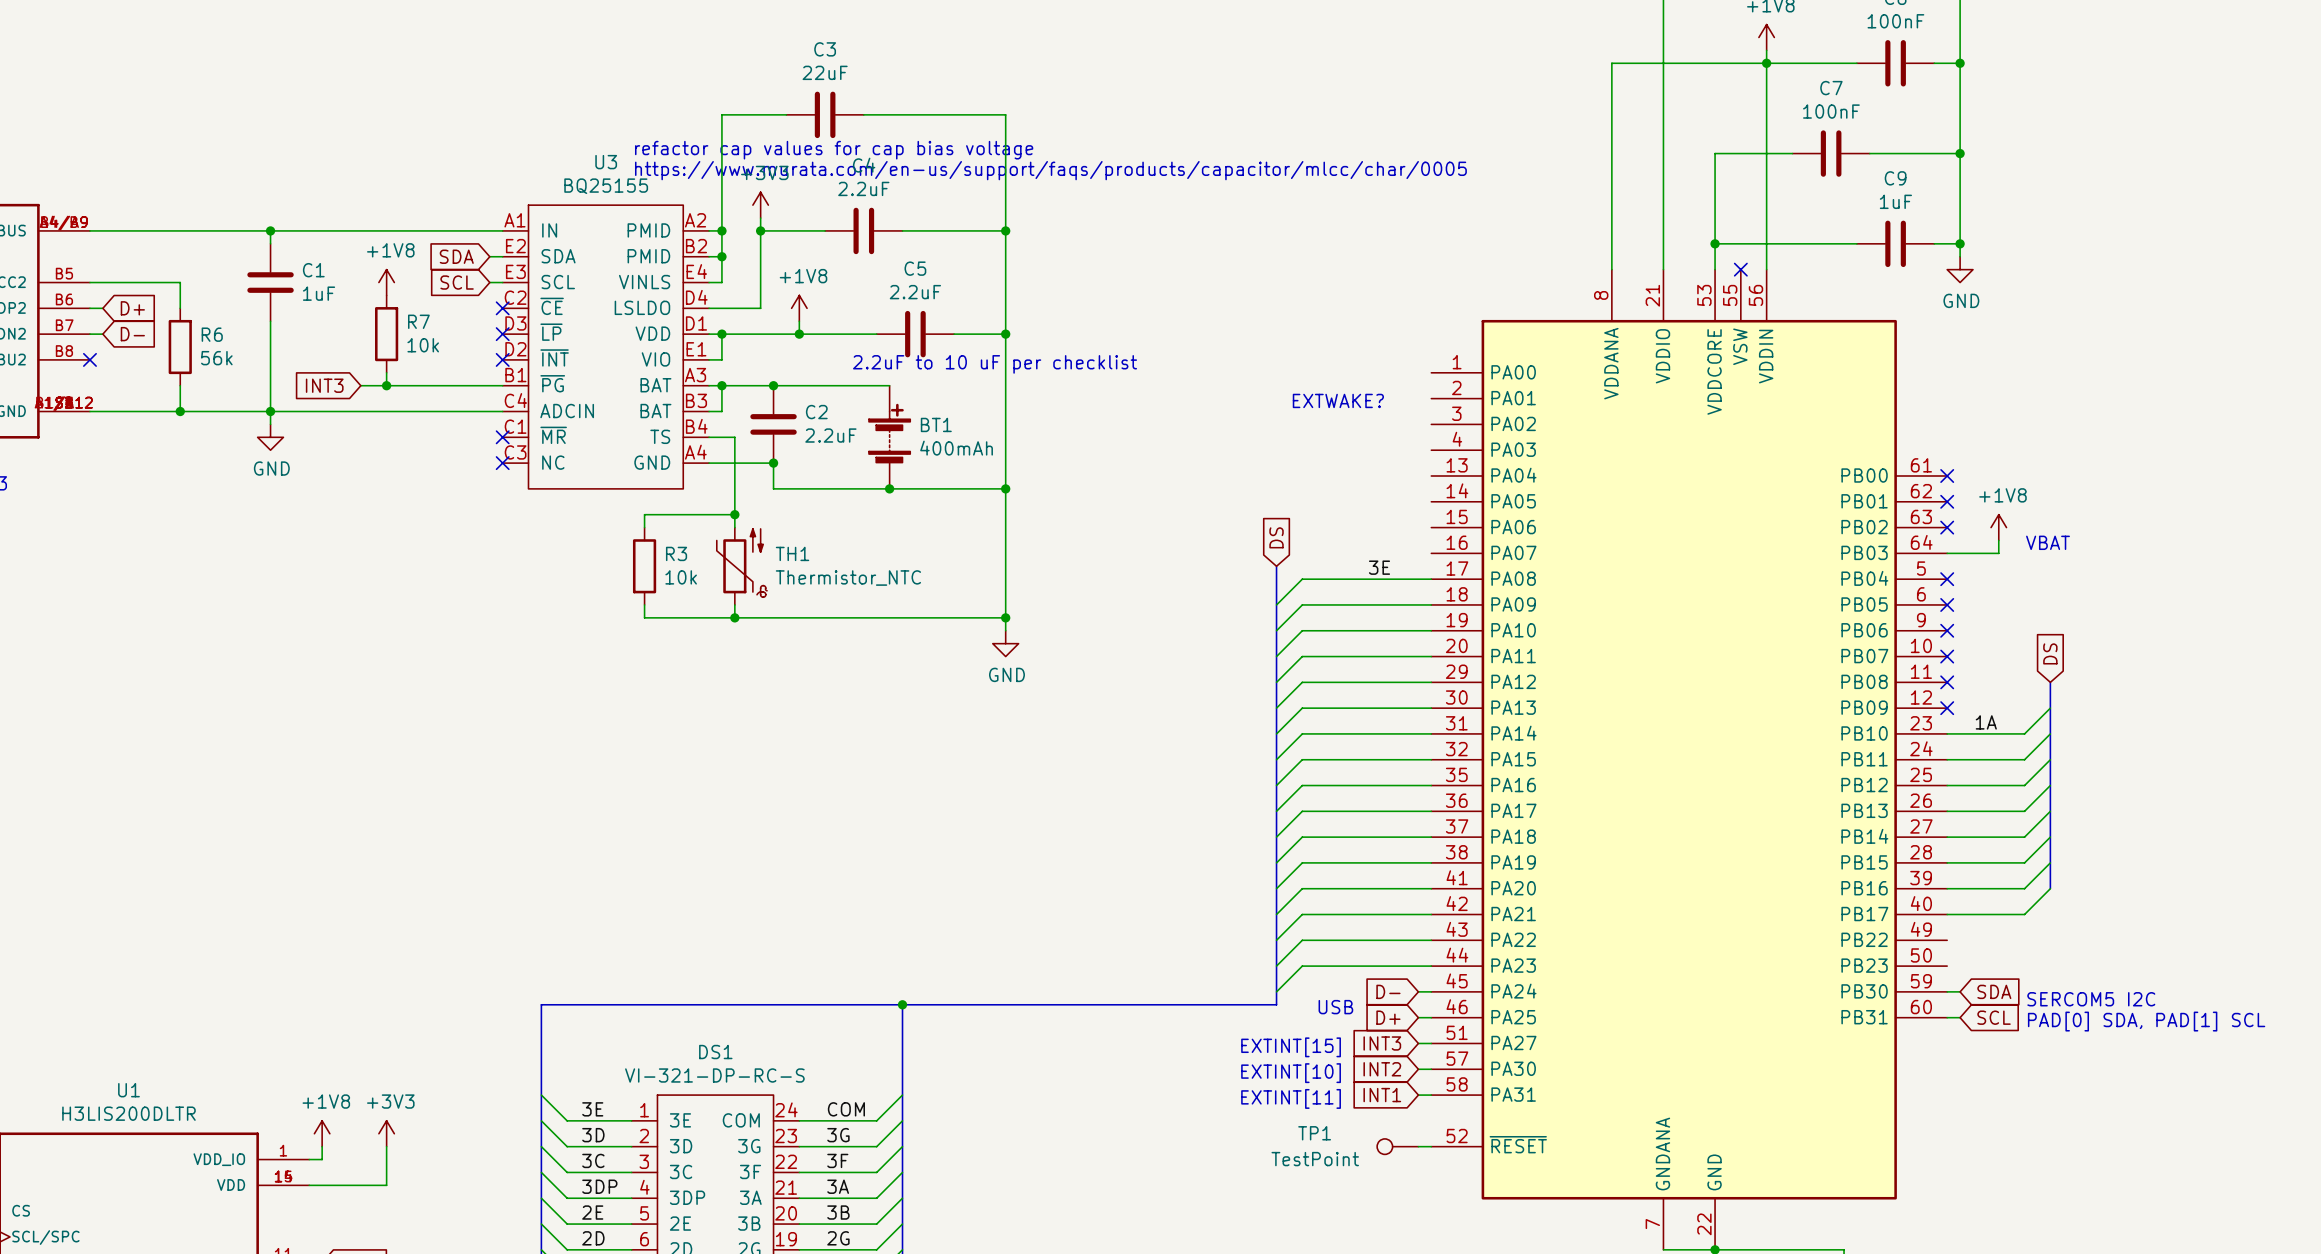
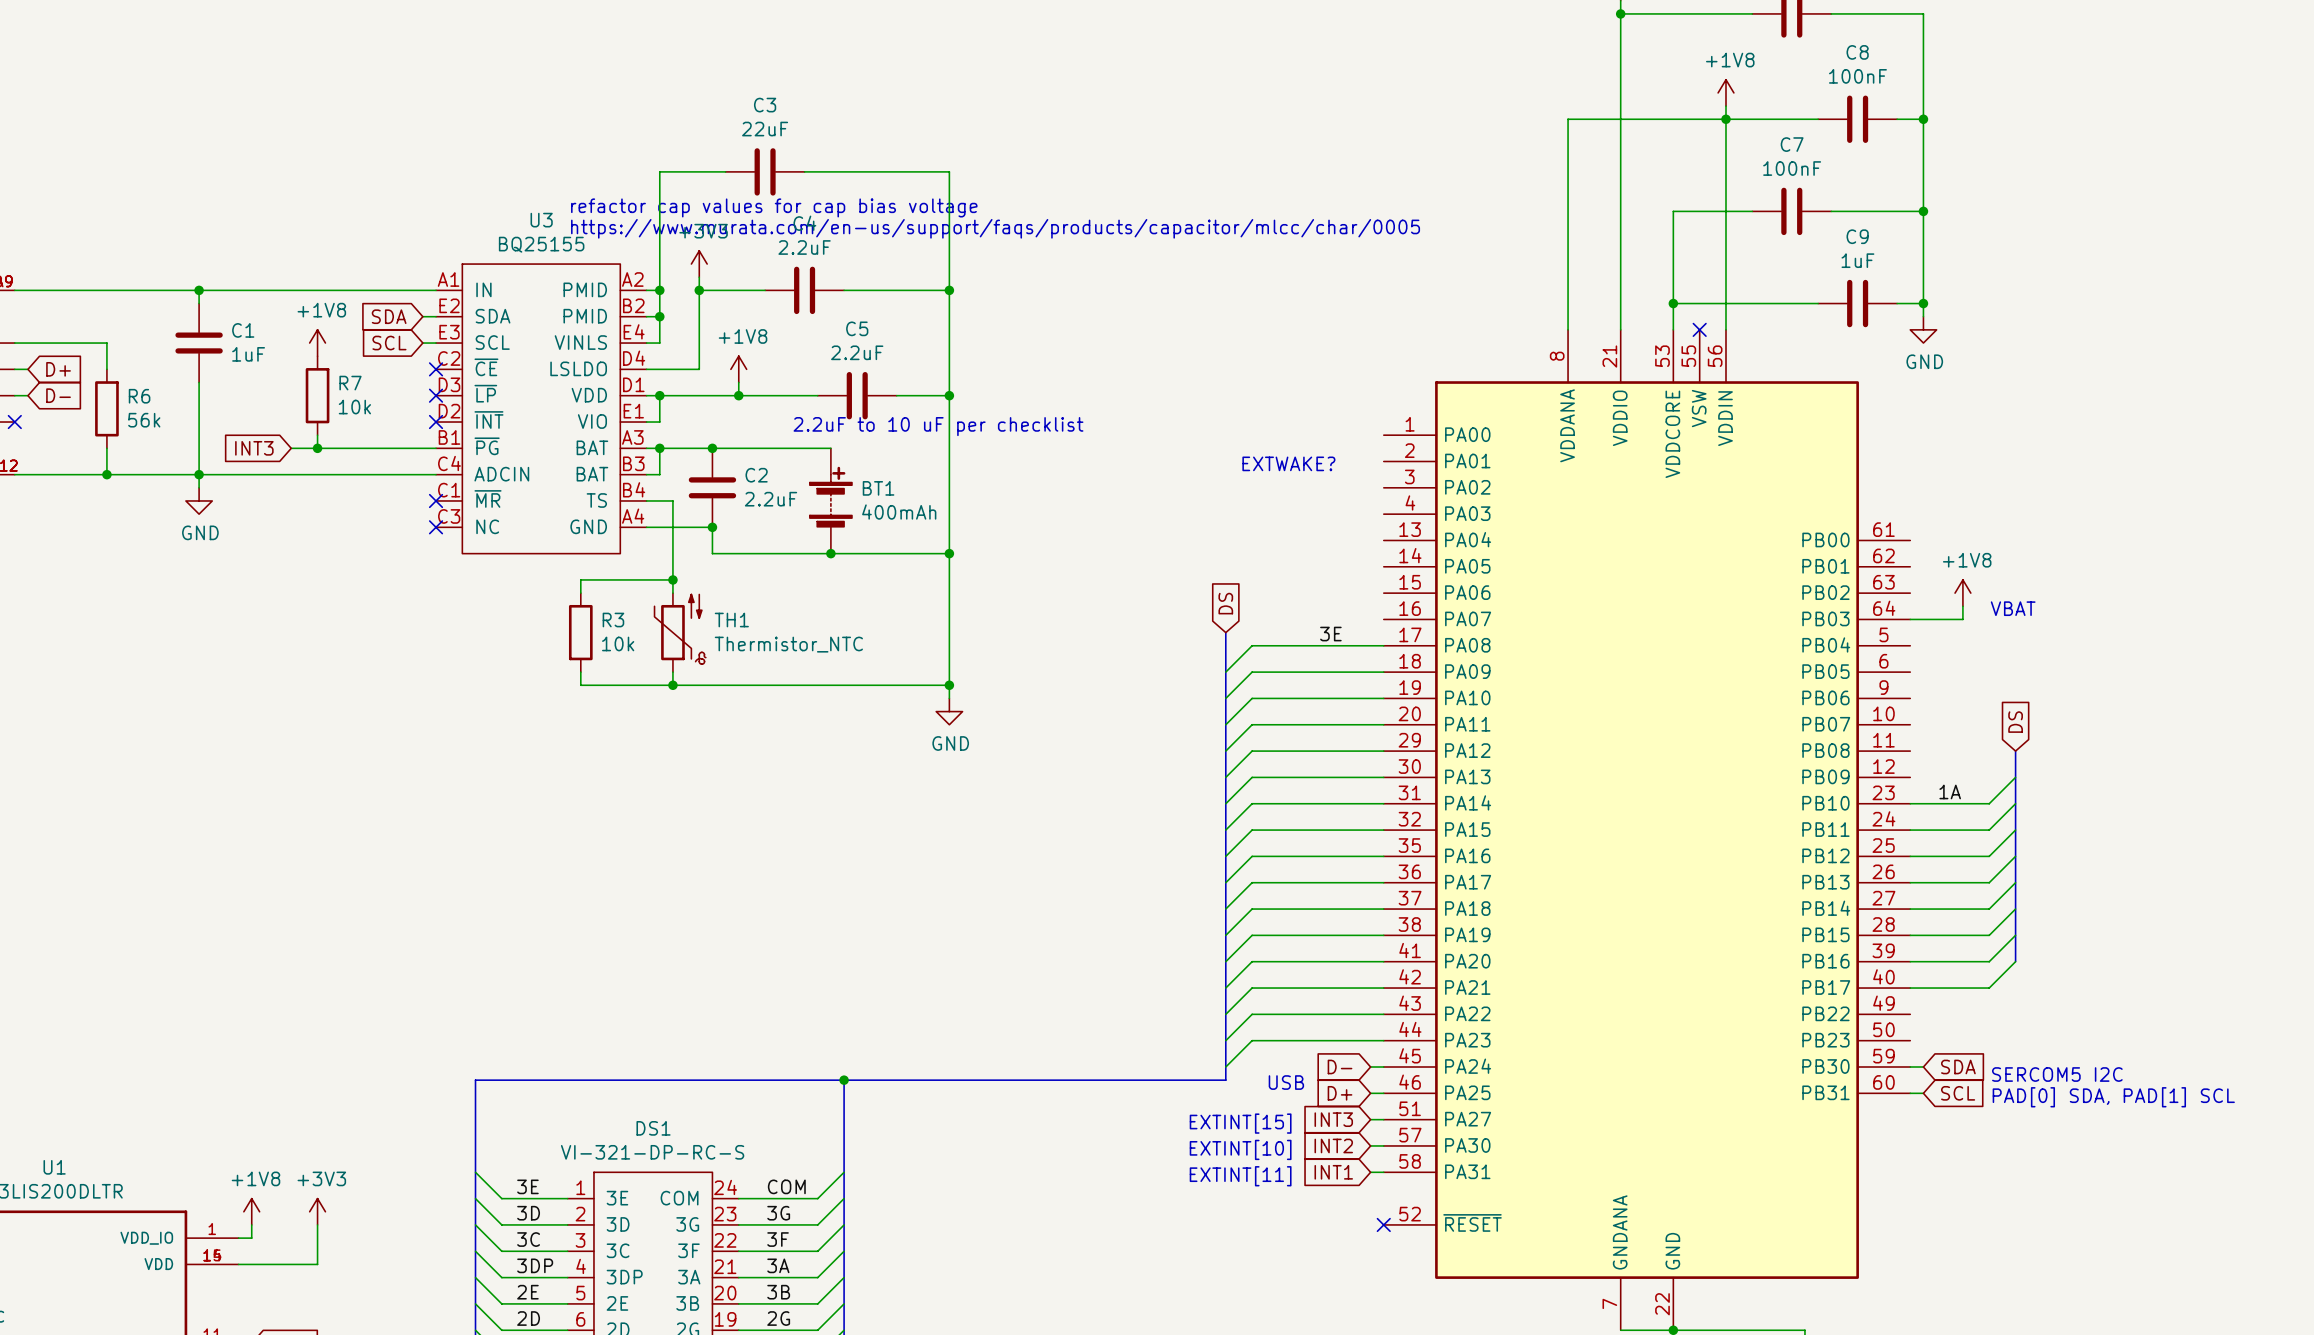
no-connect mark: (1947, 476) -> none
no-connect mark: (1947, 501) -> none
no-connect mark: (1947, 527) -> none
no-connect mark: (1947, 579) -> none
no-connect mark: (1947, 604) -> none
no-connect mark: (1947, 630) -> none
no-connect mark: (1947, 656) -> none
no-connect mark: (1947, 682) -> none
no-connect mark: (1947, 708) -> none
TP1: TestPoint (1397, 1146) -> none
wire: (1418, 1146) (1431, 1146) -> none
no-connect mark: none -> (1383, 1224)

